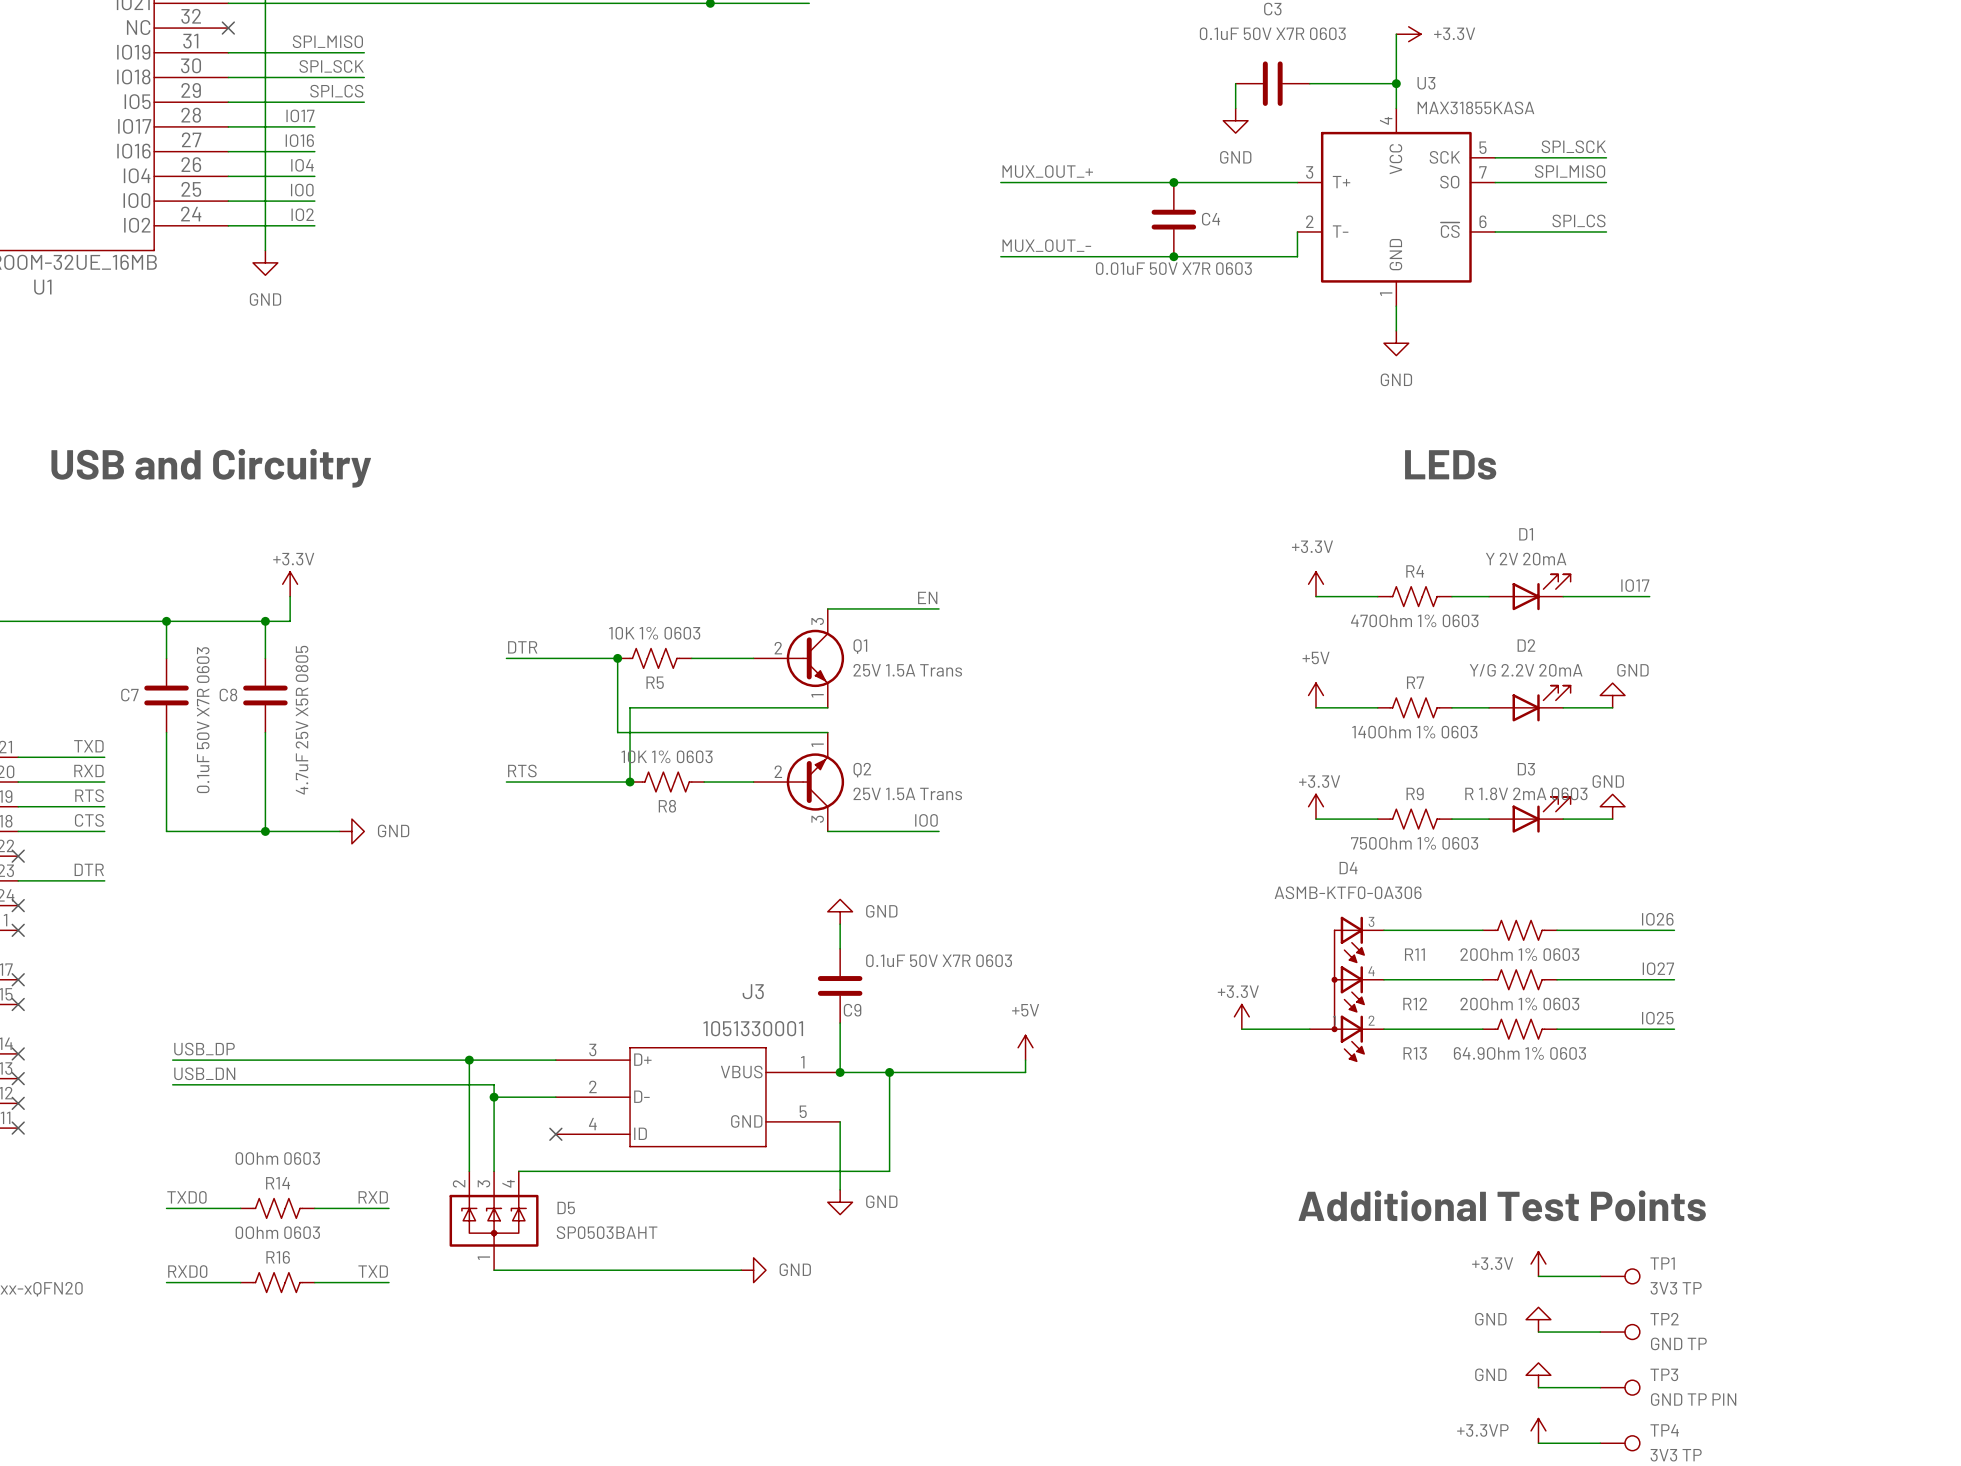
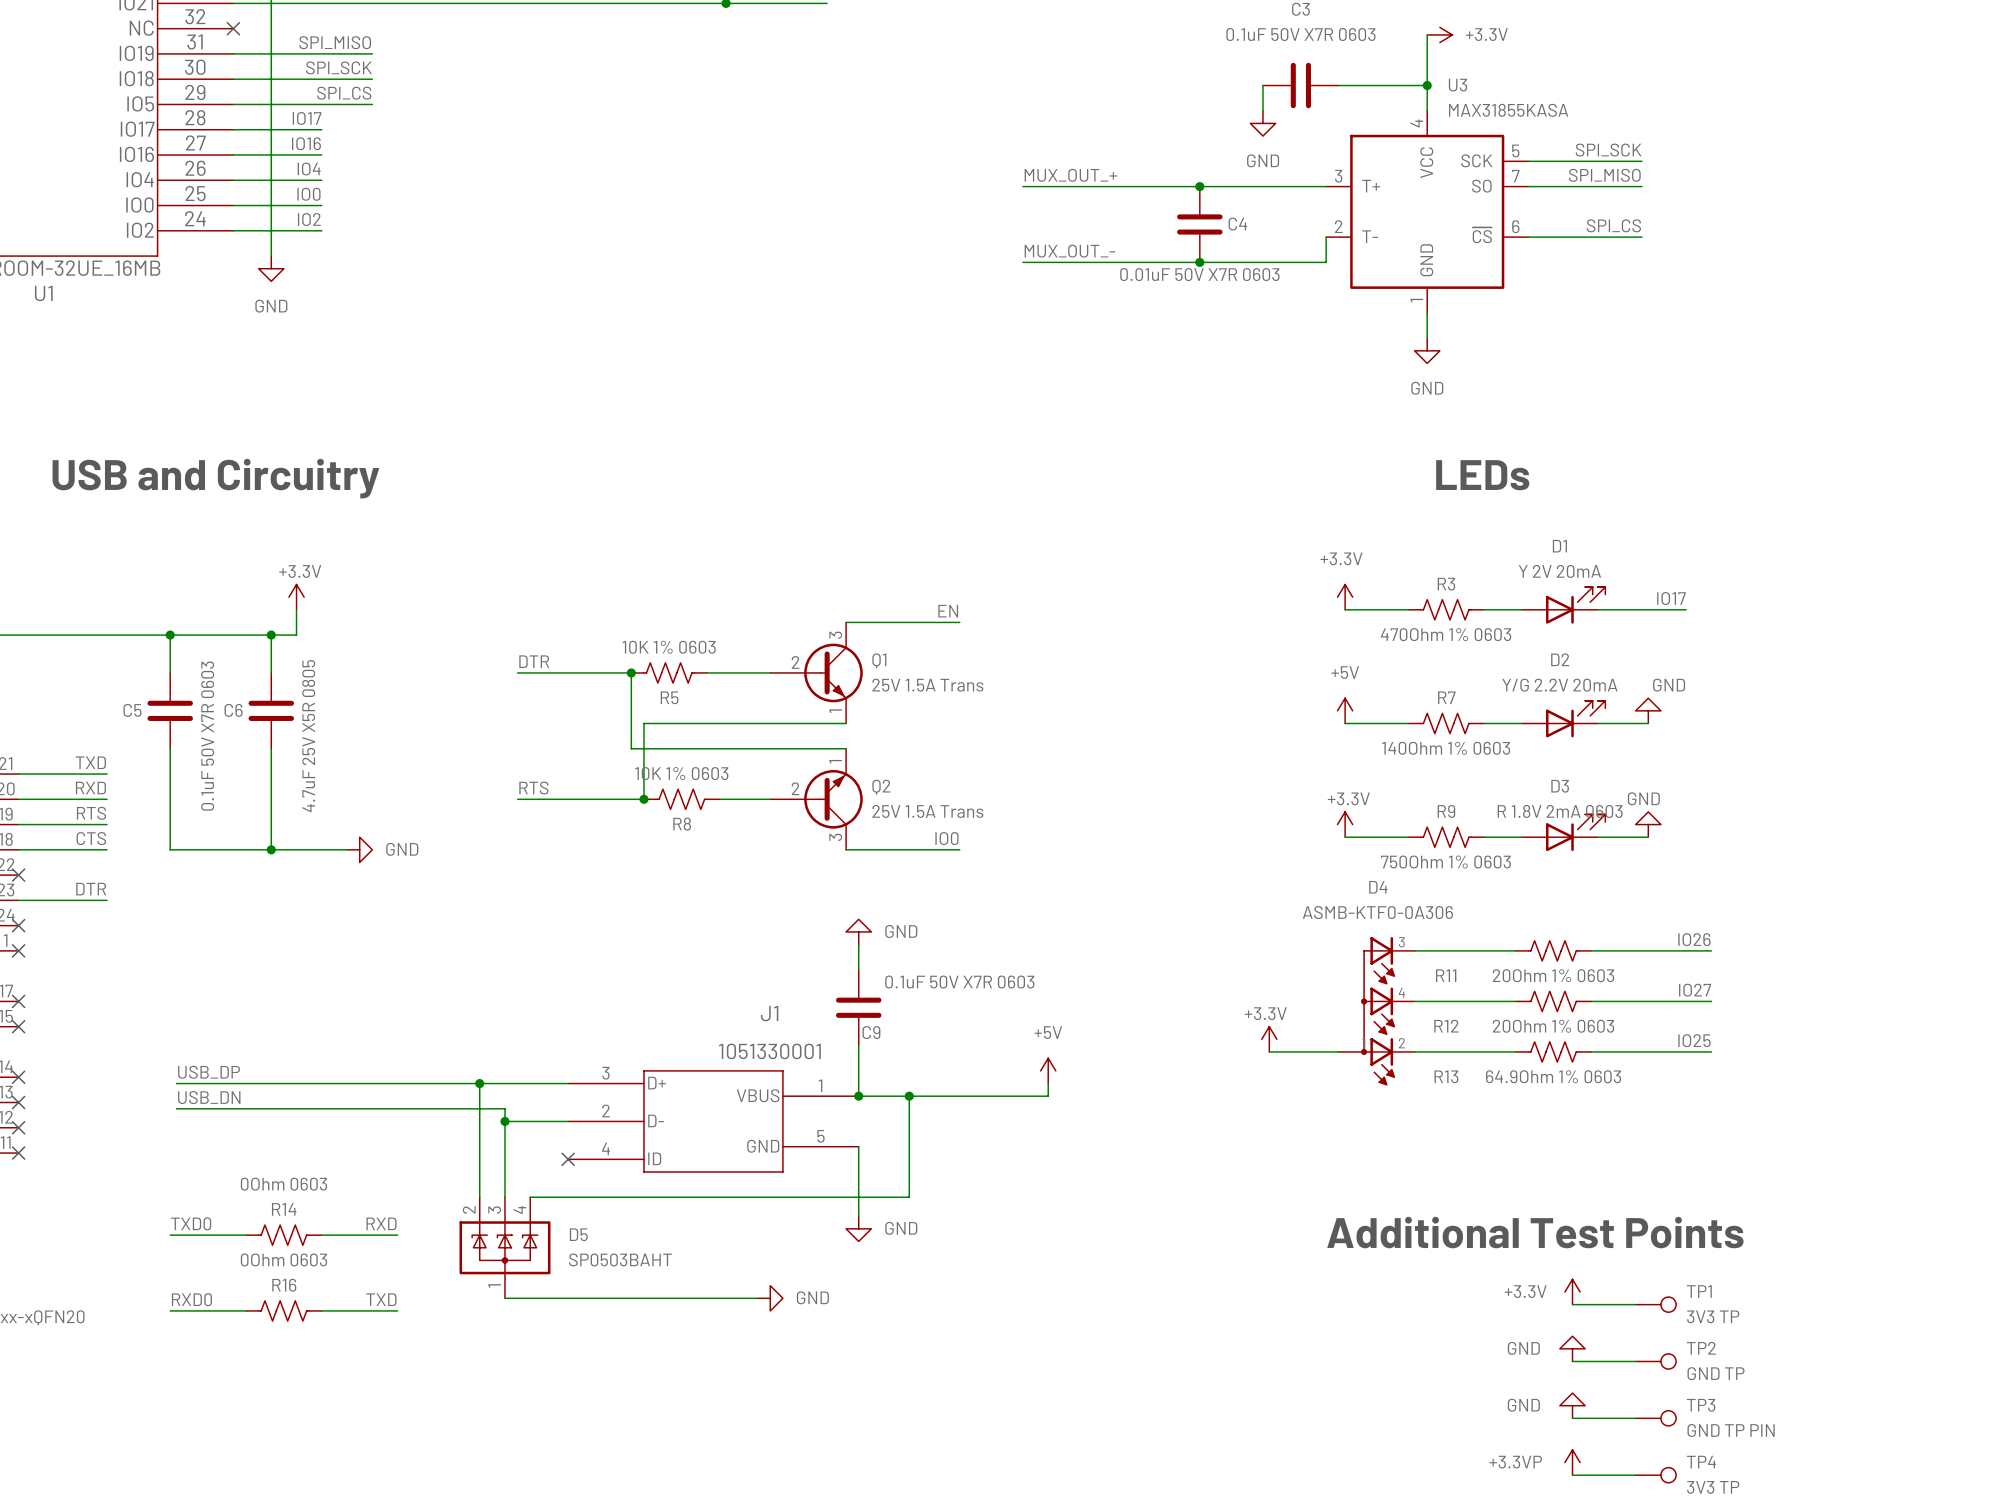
R4 name: R4 (1415, 571) -> R3 (1446, 584)
C7 name: C7 (129, 695) -> C5 (132, 710)
C8 name: C8 (228, 695) -> C6 (233, 710)
J3 name: J3 (753, 991) -> J1 (769, 1013)

